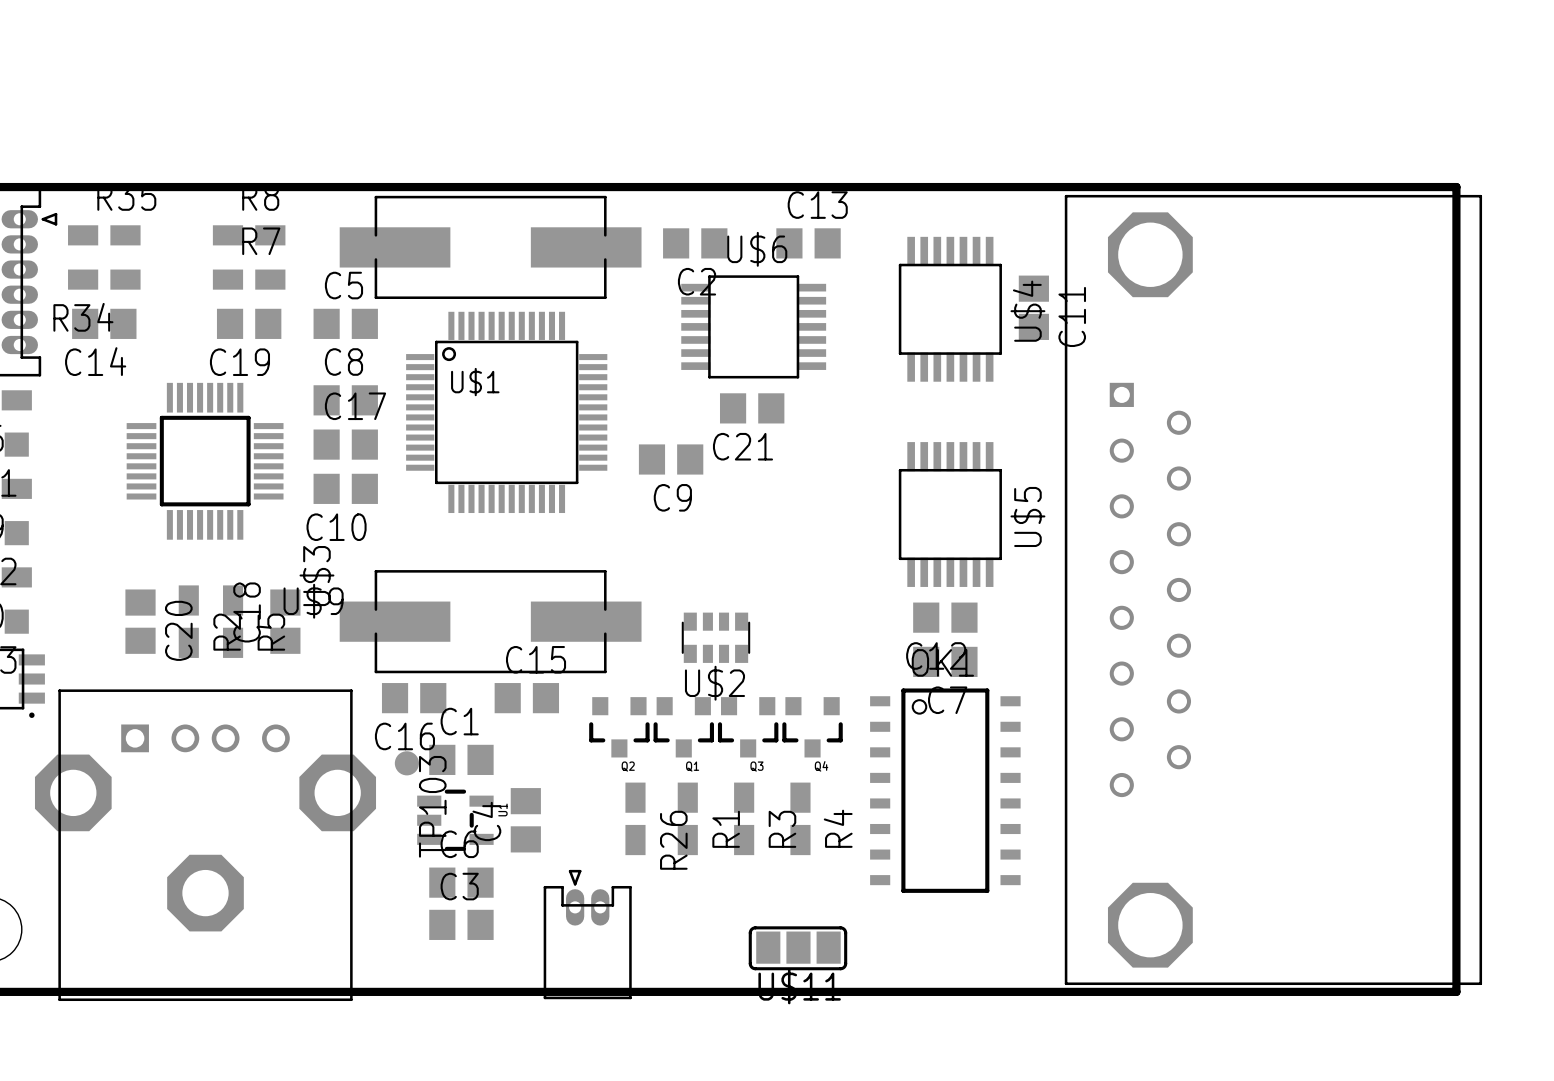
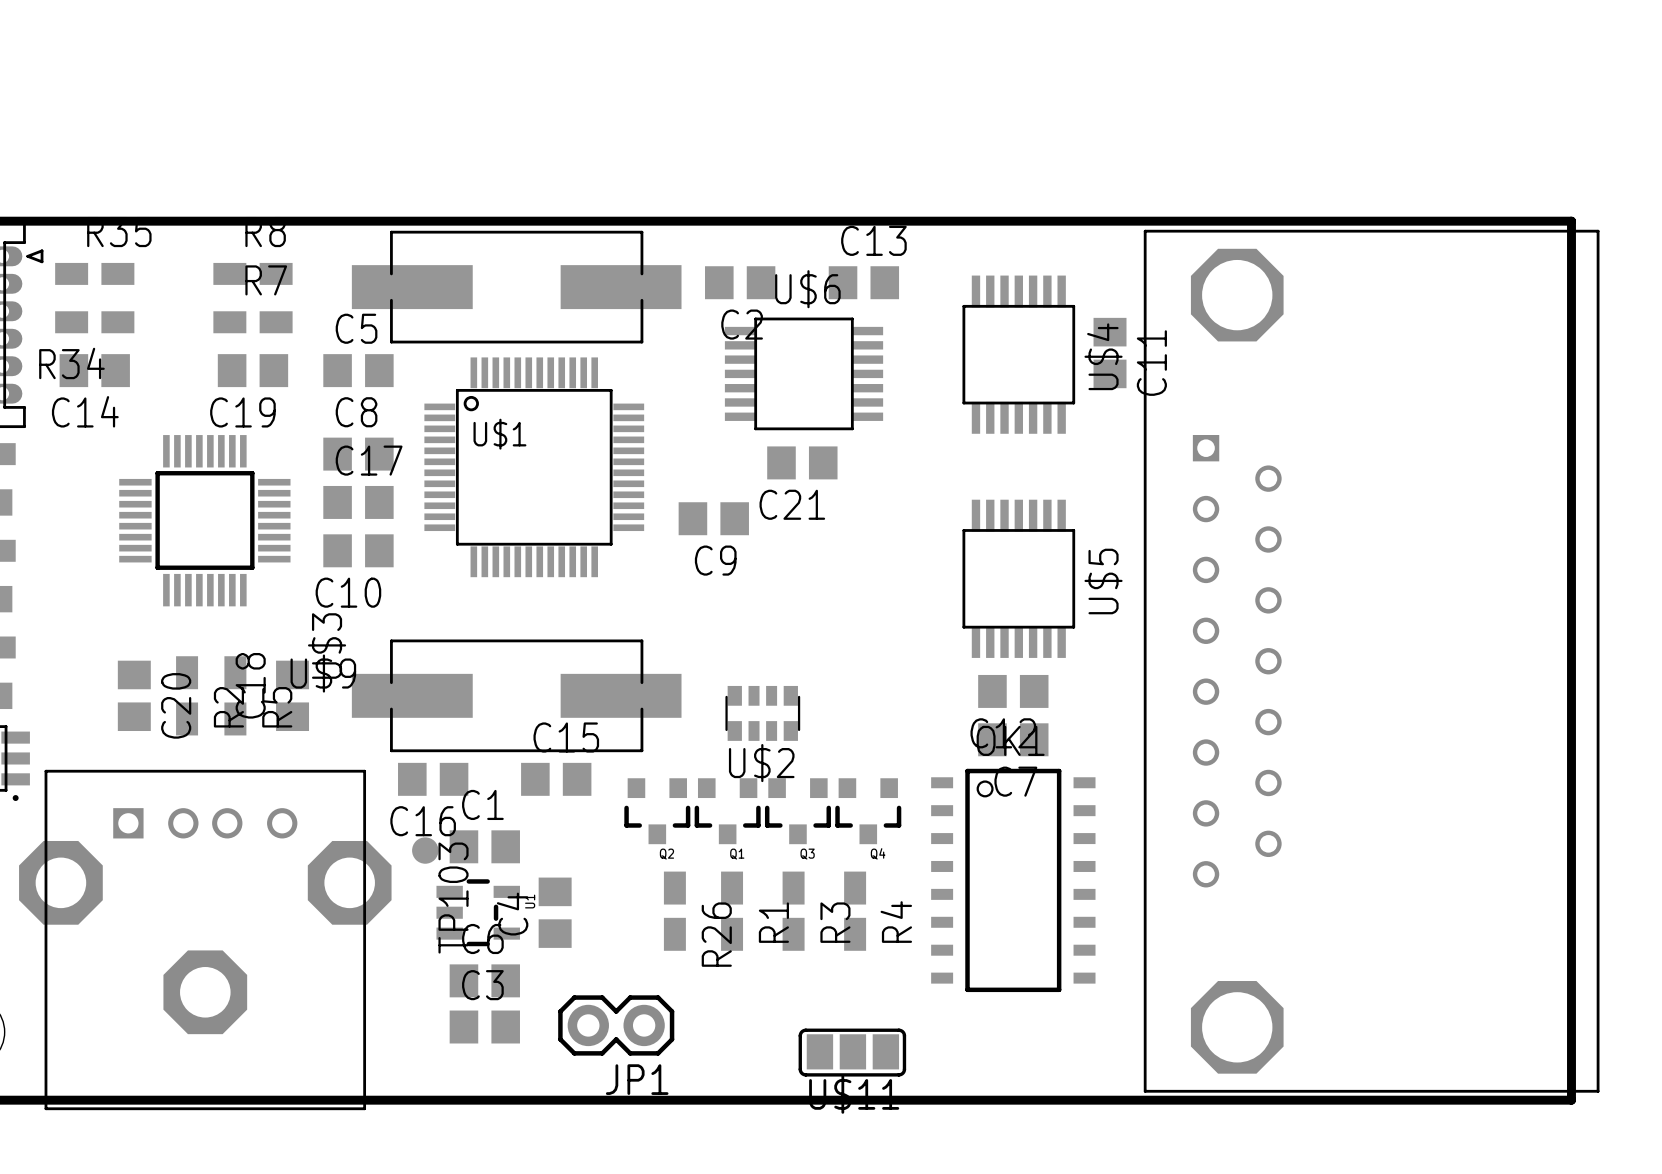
JP1: none -> (616, 1025)
part: (587, 934) -> none

